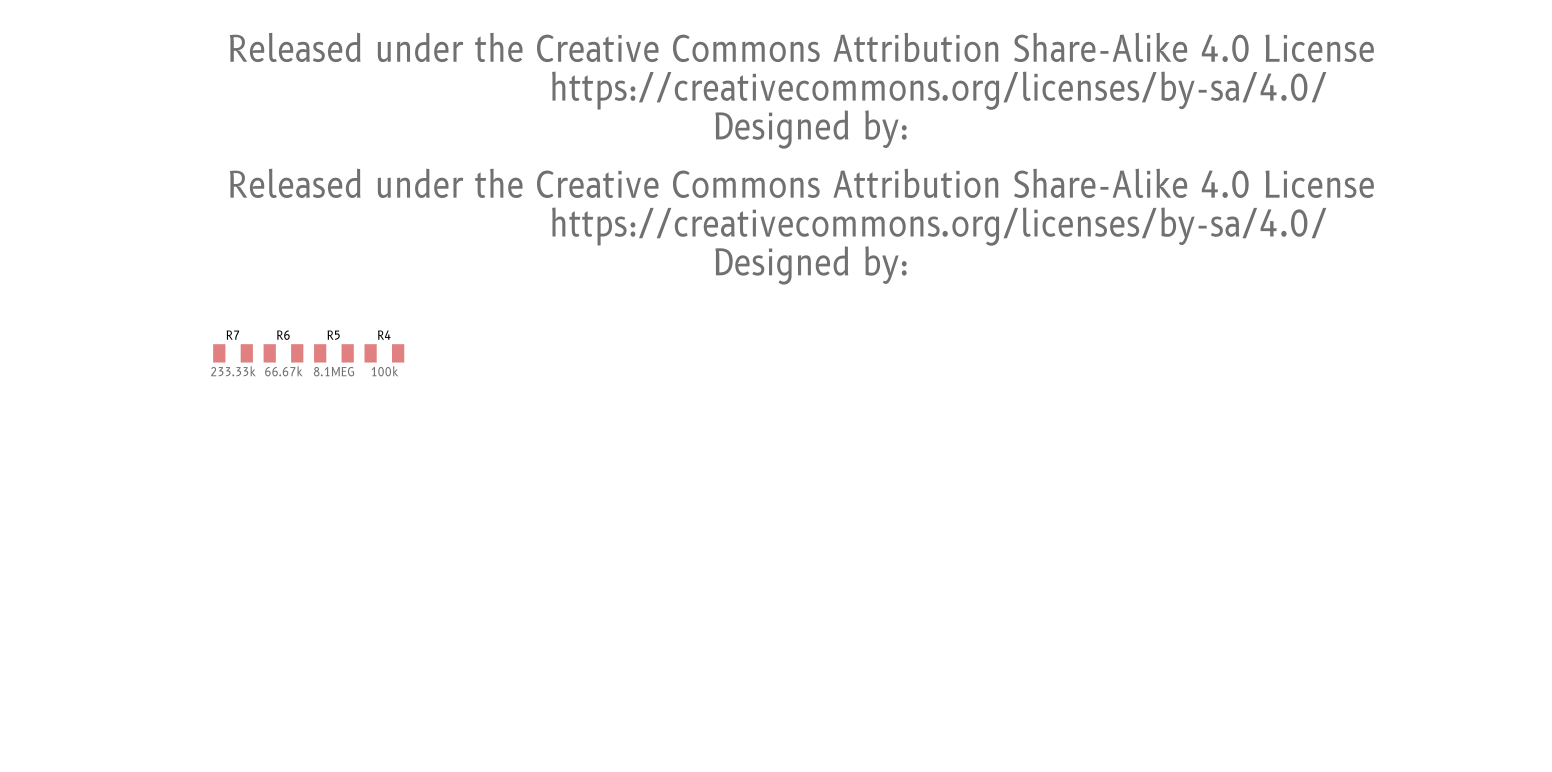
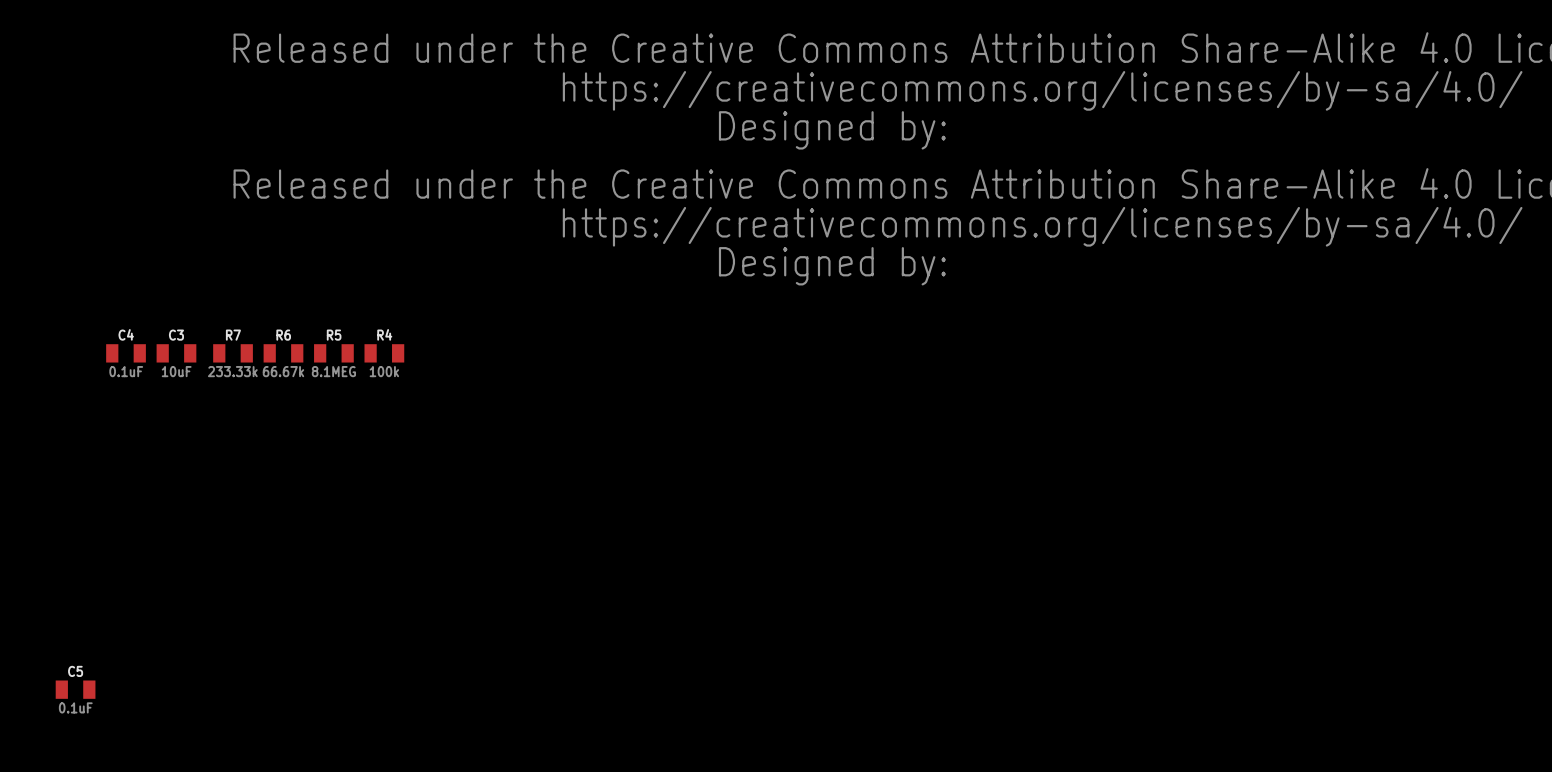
C4: none -> 0.1uF (126, 353)
C3: none -> 10uF (176, 353)
C5: none -> 0.1uF (75, 689)

